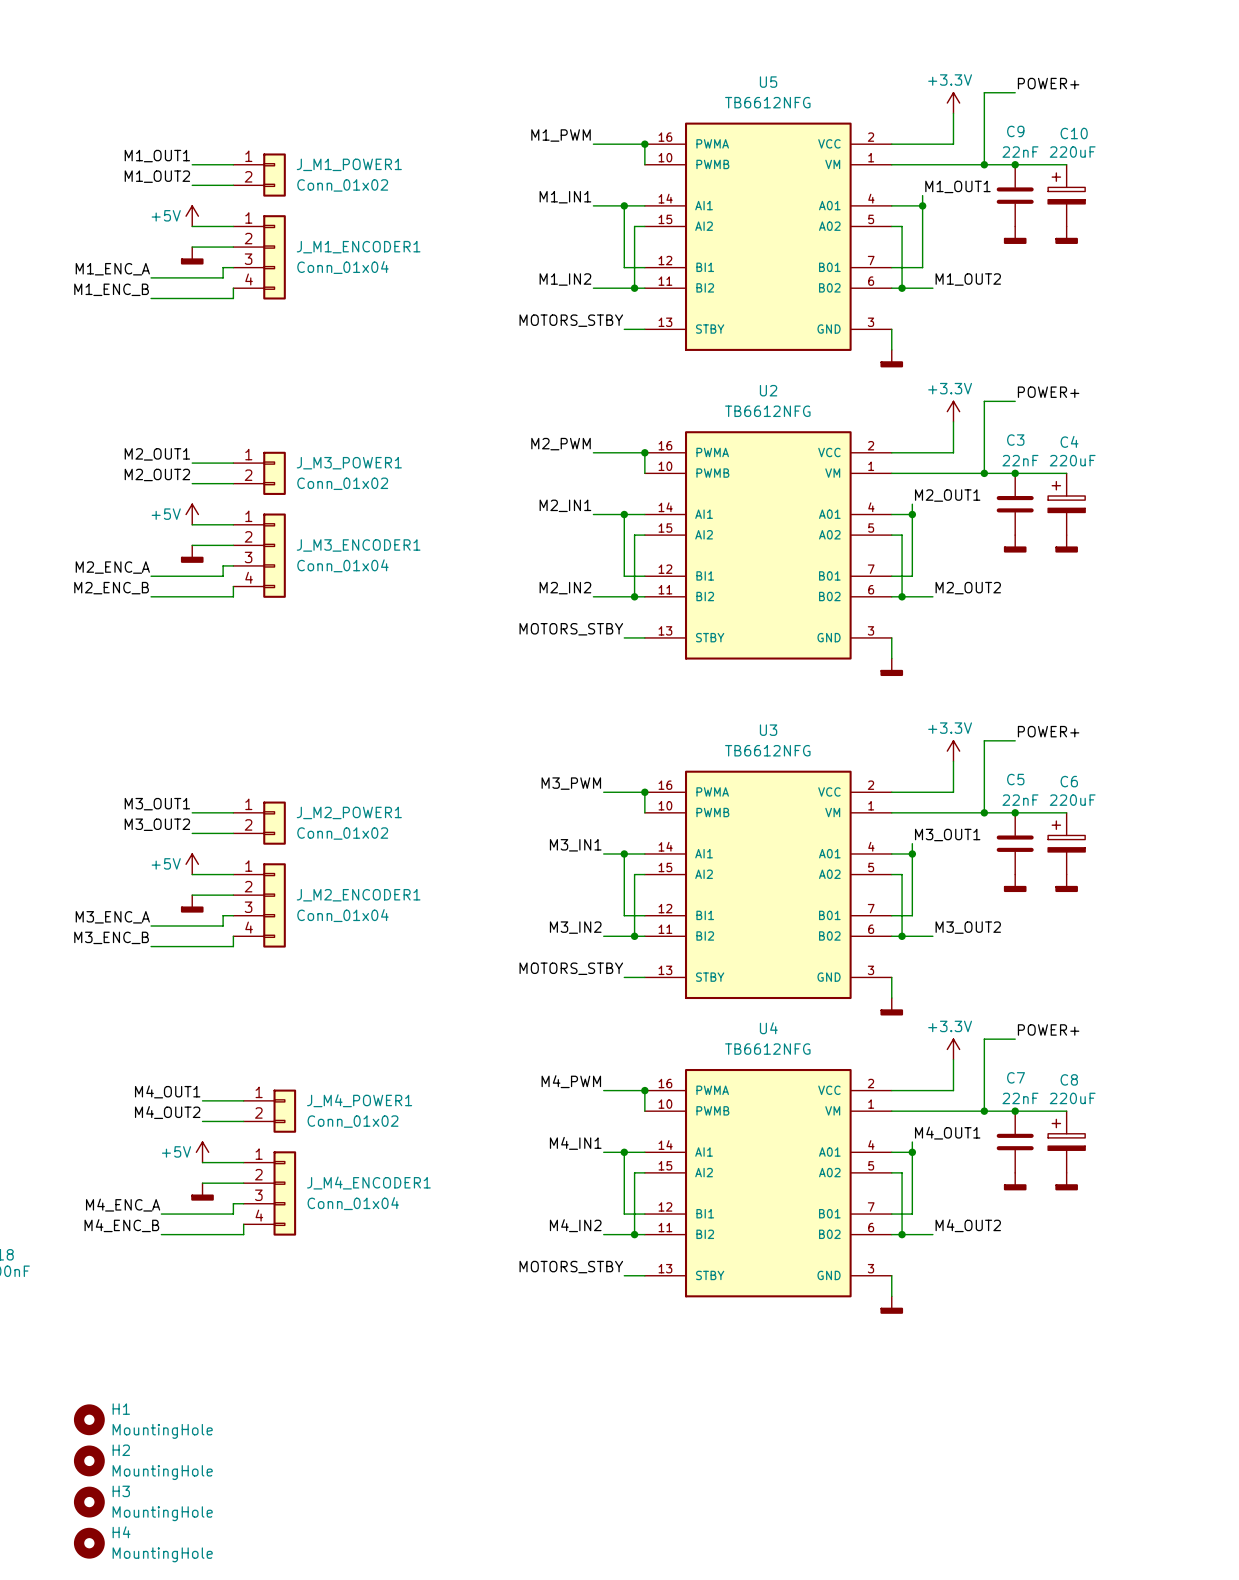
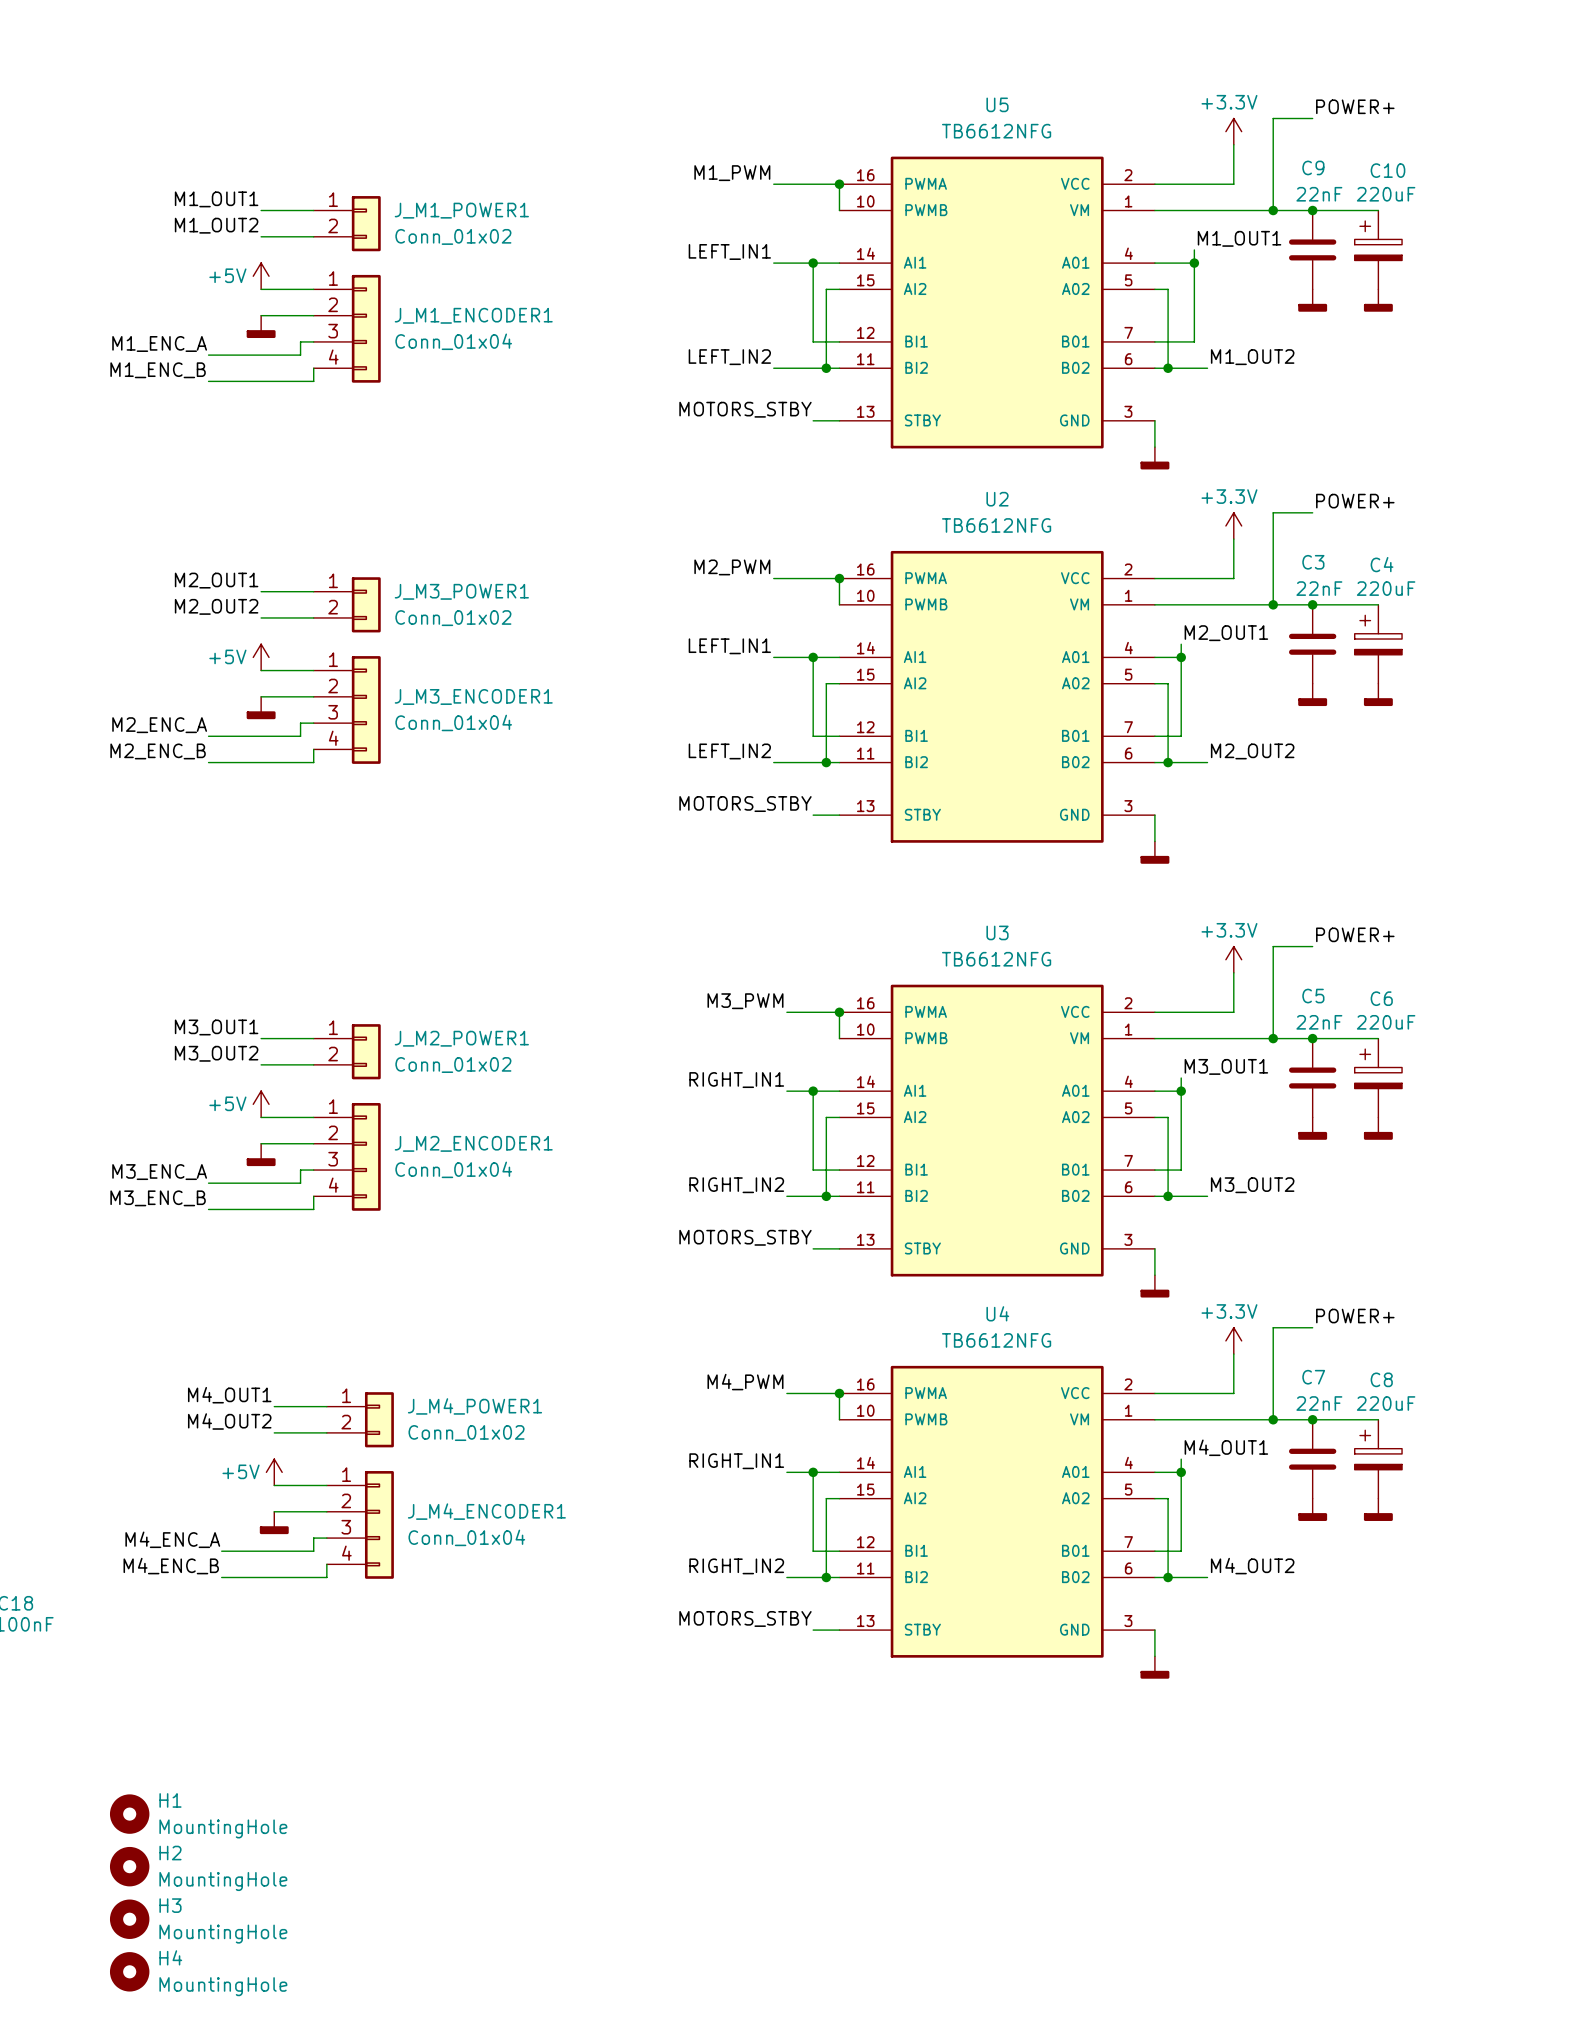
label: M1_IN1 (565, 197) -> LEFT_IN1 (729, 251)
label: M1_IN2 (565, 279) -> LEFT_IN2 (729, 357)
label: M2_IN1 (565, 505) -> LEFT_IN1 (729, 646)
label: M2_IN2 (565, 588) -> LEFT_IN2 (729, 751)
label: M3_IN1 (575, 845) -> RIGHT_IN1 (736, 1080)
label: M3_IN2 (575, 927) -> RIGHT_IN2 (736, 1185)
label: M4_IN1 (575, 1143) -> RIGHT_IN1 (736, 1461)
label: M4_IN2 (575, 1225) -> RIGHT_IN2 (736, 1566)

